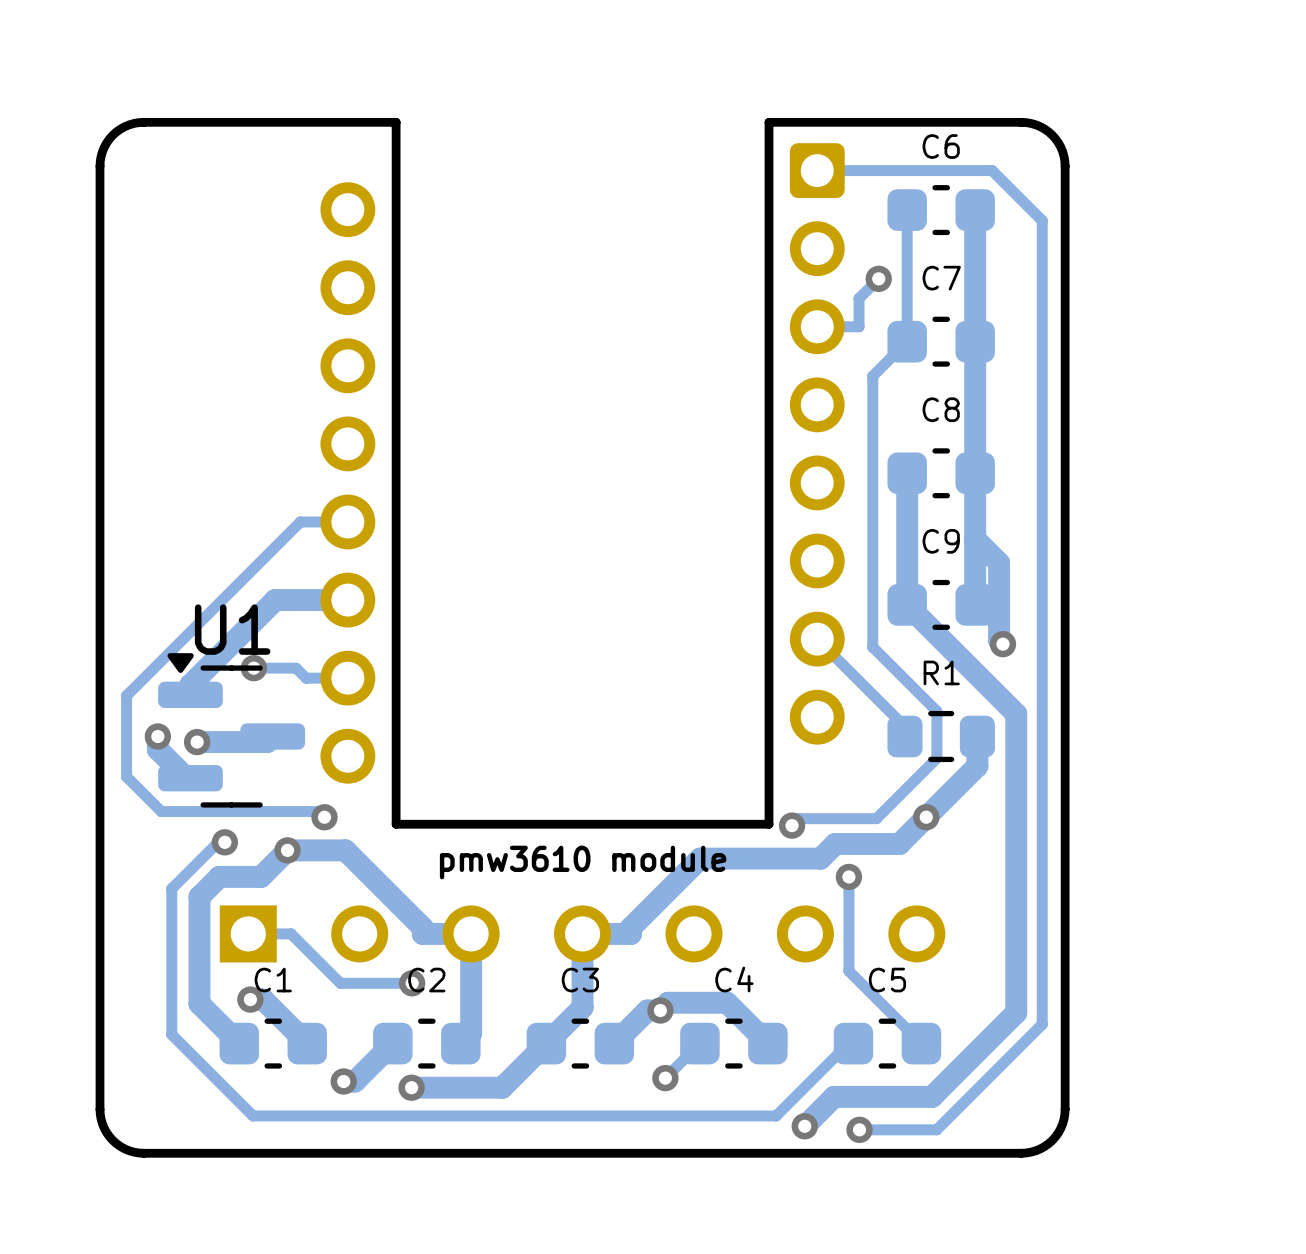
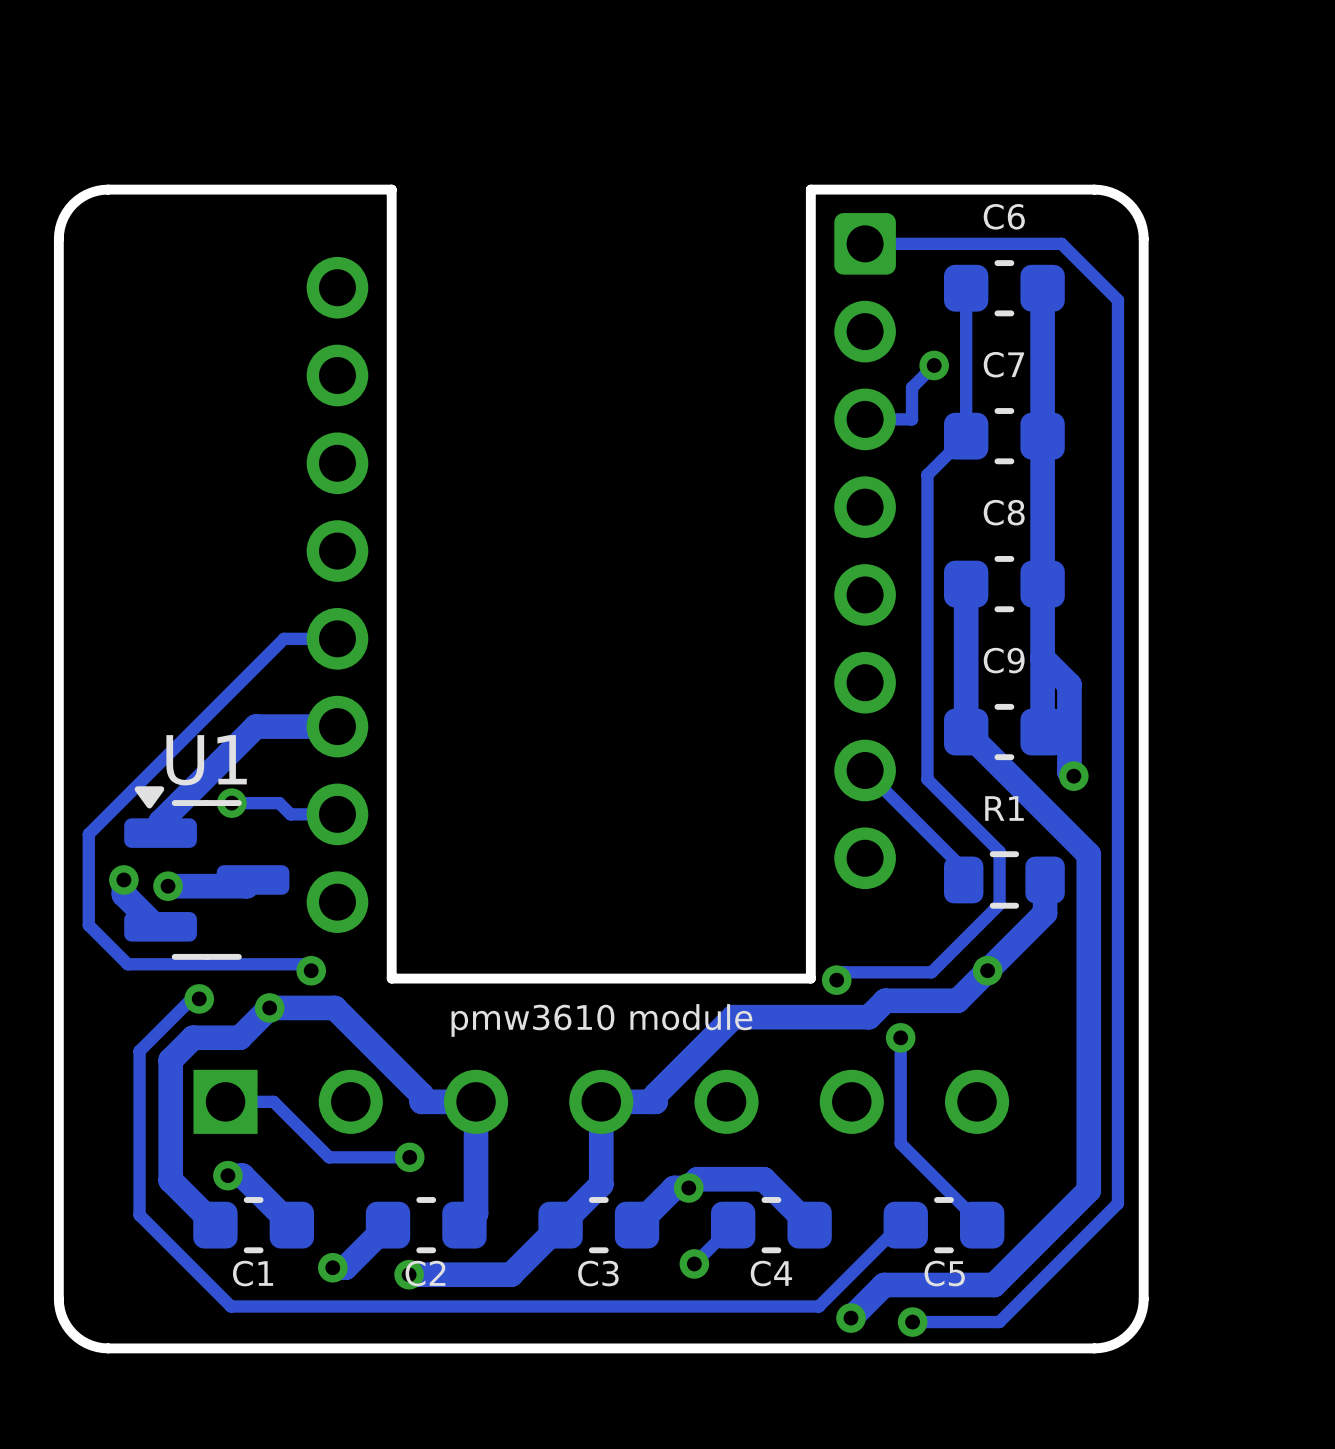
C4 name position: C4 (734, 979) -> C4 (771, 1273)
C1 name position: C1 (273, 980) -> C1 (253, 1273)
C2 name position: C2 (426, 980) -> C2 (425, 1273)
C3 name position: C3 (580, 980) -> C3 (598, 1273)
C5 name position: C5 (887, 980) -> C5 (944, 1273)

